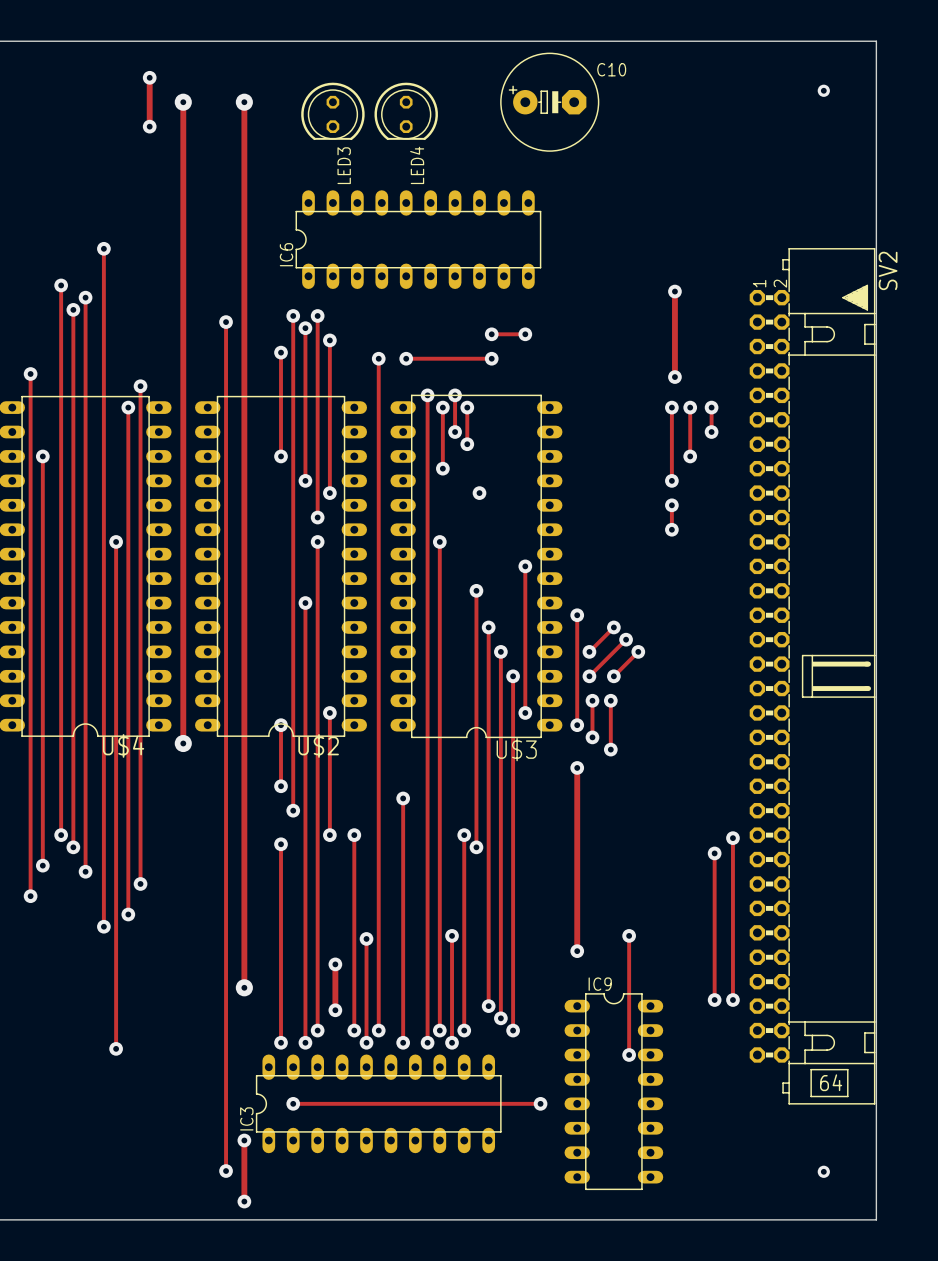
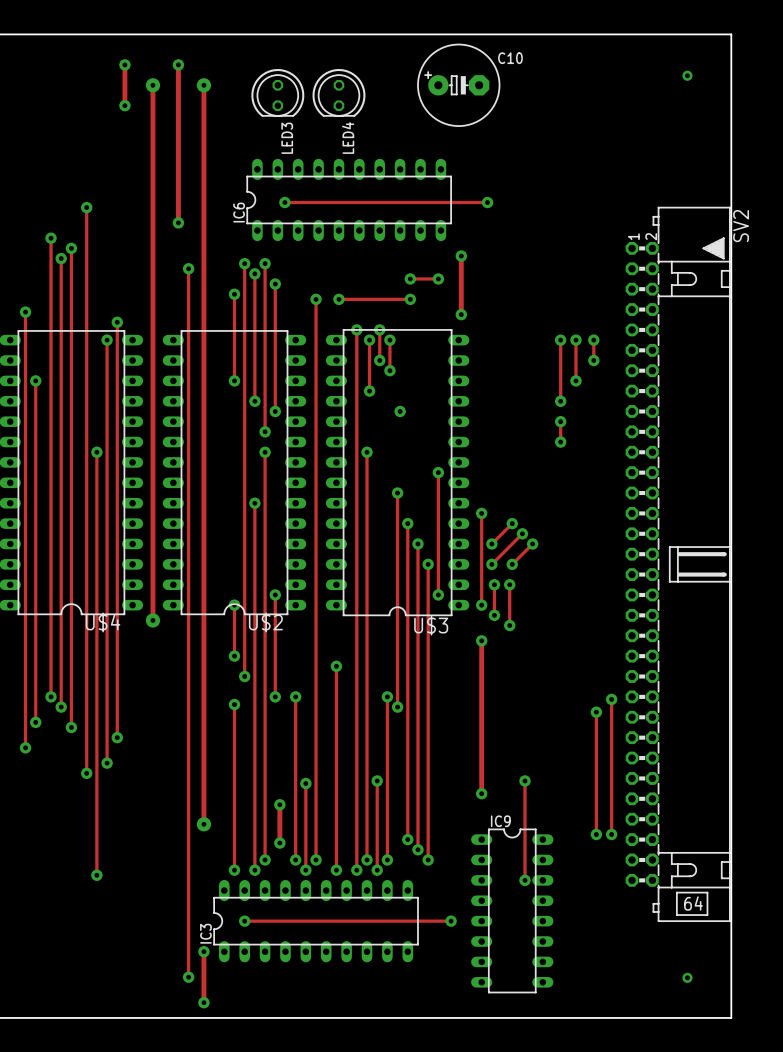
track: none -> (178, 64) (178, 222)
via: none -> (178, 64)
track: none -> (284, 202) (487, 202)
via: none -> (284, 202)
via: none -> (487, 202)
via: none -> (178, 222)
track: (674, 291) (674, 377) -> none
via: (674, 291) -> none
track: none -> (461, 256) (461, 314)
via: none -> (461, 256)
via: none -> (461, 314)
via: (674, 377) -> none

